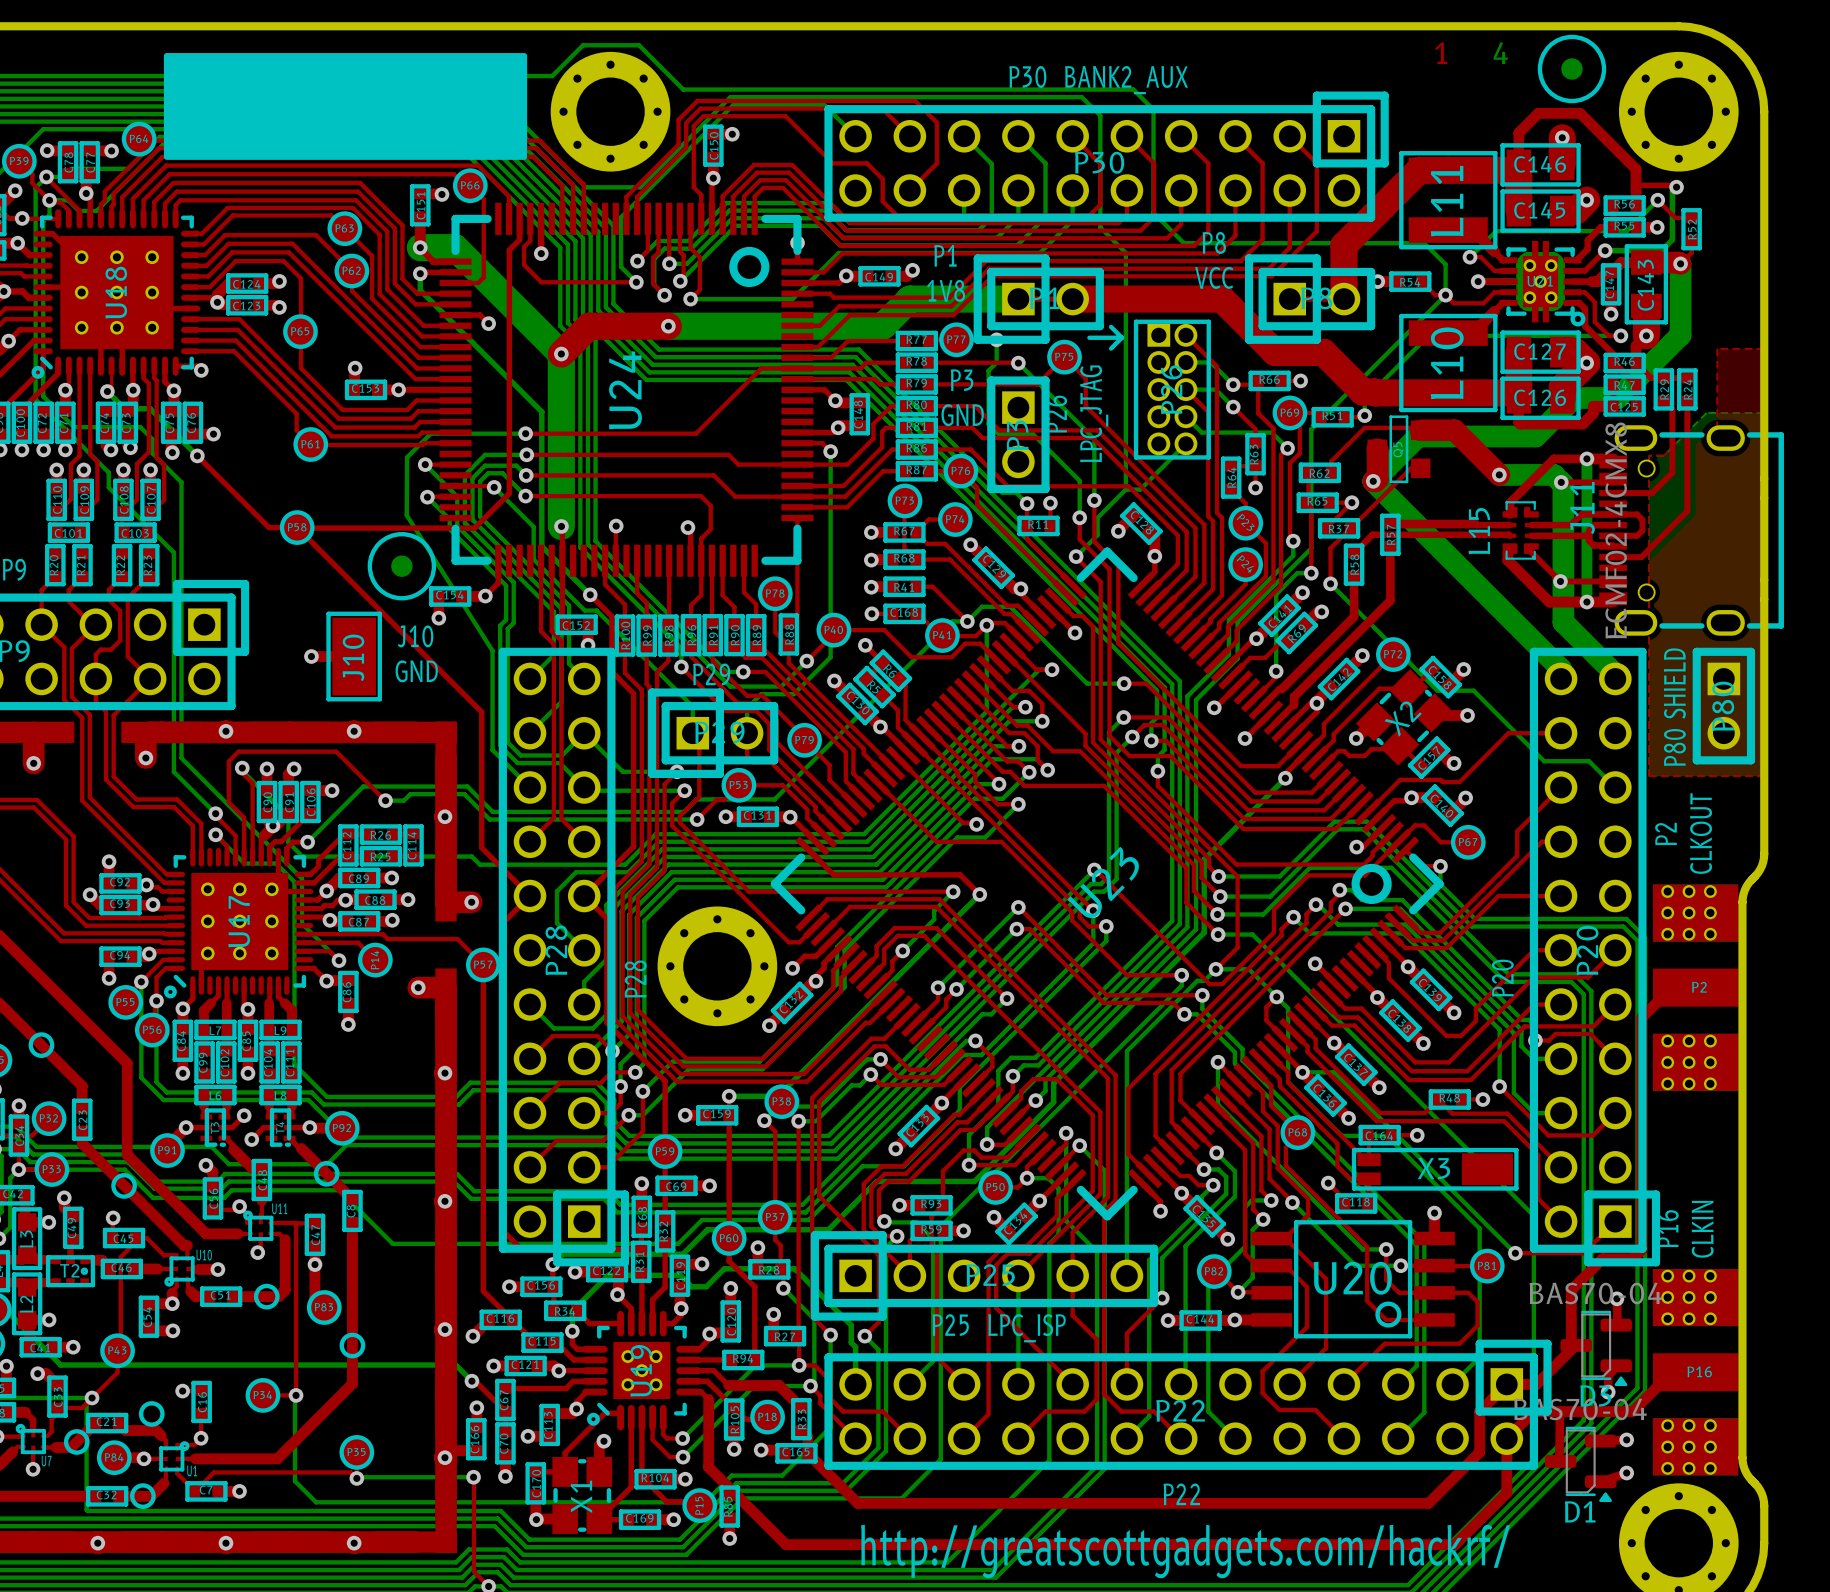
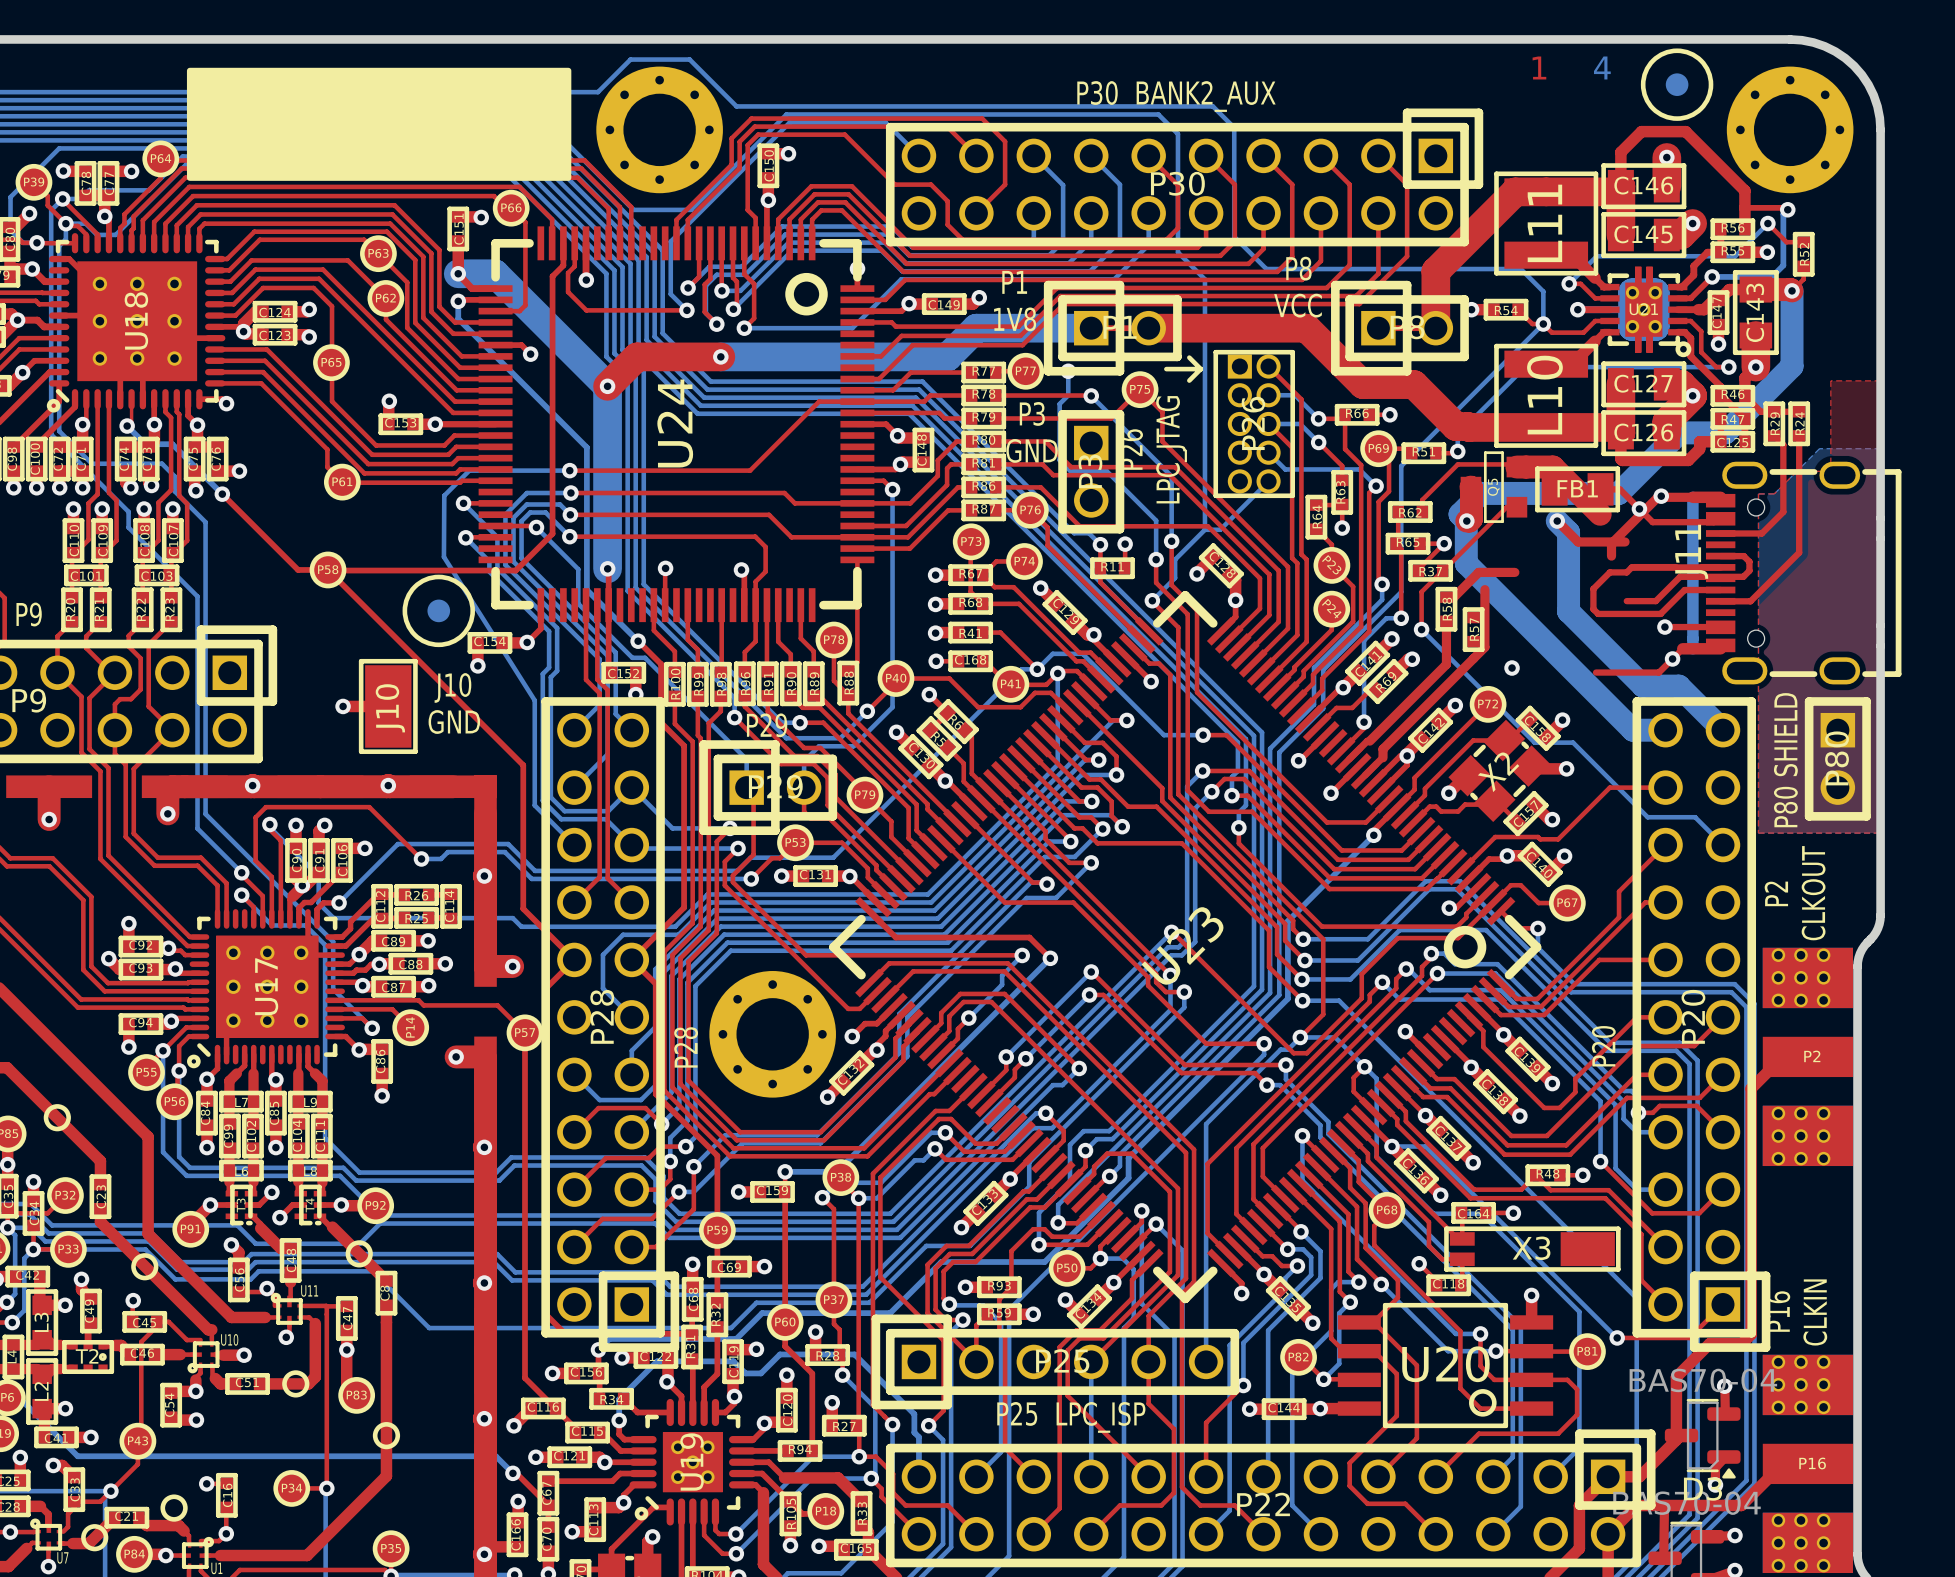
bottom track: (1535, 436) (1418, 436) (1373, 481) (1561, 669) (1561, 678) -> (1638, 473) (1618, 493) (1480, 493) (1460, 514) (1466, 520) (1466, 563) (1633, 730) (1665, 730)
FB1: none -> (1577, 489)
top track: none -> (1600, 489) (1619, 489) (1652, 522) (1665, 522)
via: none -> (1661, 496)
via: (1586, 458) -> none
via: none -> (1639, 508)
bottom track: (1499, 474) (1553, 474) (1563, 484) (1563, 622) (1615, 674) (1615, 678) -> (1557, 521) (1568, 532) (1568, 611) (1643, 686) (1678, 686) (1722, 730)
via: (1499, 474) -> none
top track: none -> (1557, 521) (1578, 541) (1625, 541)
via: none -> (1557, 521)
via: (1561, 482) -> none
top track: (1613, 514) (1581, 514) (1570, 525) -> (1701, 567) (1675, 567)
top track: (1634, 514) (1642, 519) (1642, 530) (1637, 535) (1613, 535) -> (1743, 556) (1749, 561) (1749, 570) (1743, 576) (1680, 576) (1655, 601) (1626, 601)
top track: (1392, 524) (1510, 525) -> none
top track: (1594, 525) (1589, 530) (1589, 540) (1593, 545) (1613, 546) -> (1634, 567) (1626, 572) (1609, 572) (1593, 588) (1593, 609) (1598, 613) (1660, 613) (1684, 590) (1720, 590)
L15: ECMF02-4CMX8 (1520, 530) -> none
R57 position: (1390, 534) -> (1473, 629)
top track: (1589, 534) (1531, 535) -> none
top track: (1510, 535) (1372, 534) (1354, 553) -> (1514, 572) (1478, 572) (1454, 597) (1446, 597)
top track: (1531, 546) (1531, 552) (1560, 581) -> none
top track: (1507, 551) (1507, 560) (1549, 602) (1577, 602) -> (1596, 672) (1659, 672) (1682, 648)
via position: (1586, 602) -> (1672, 658)
via: none -> (1512, 668)

